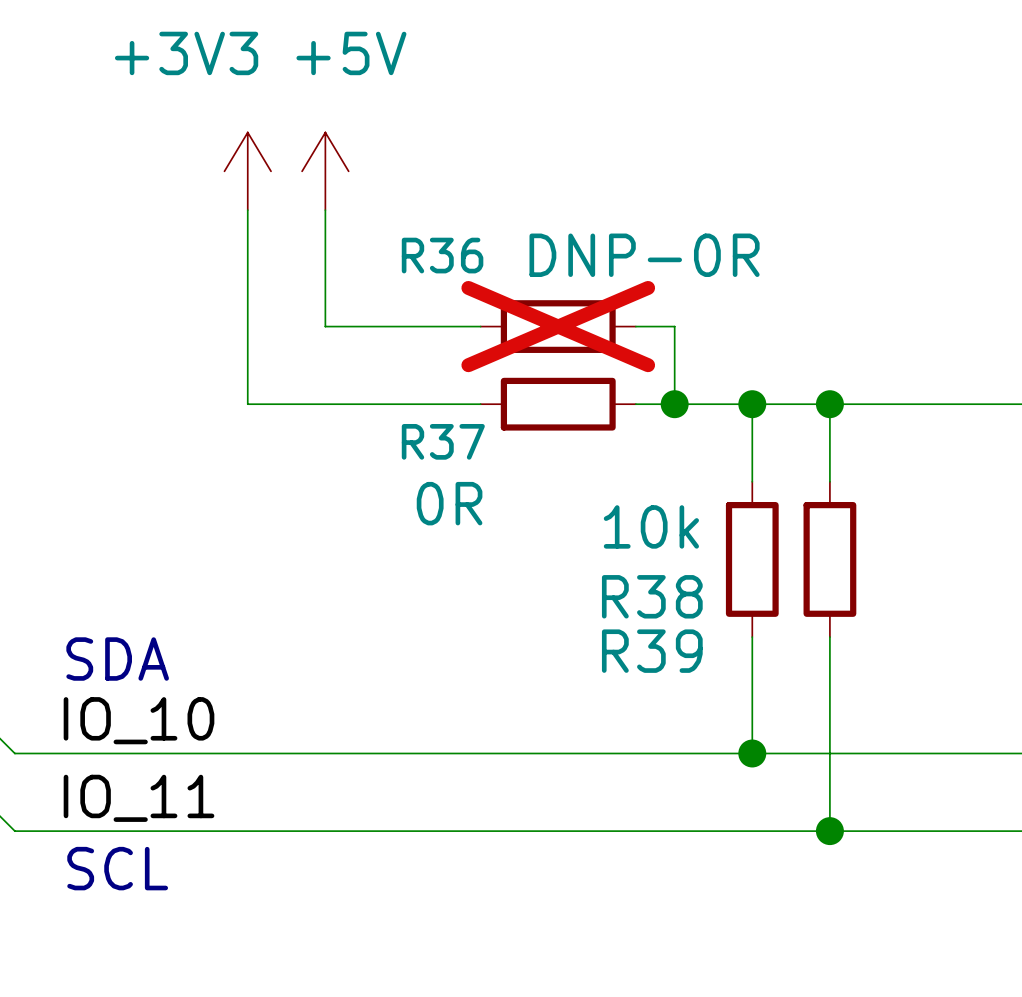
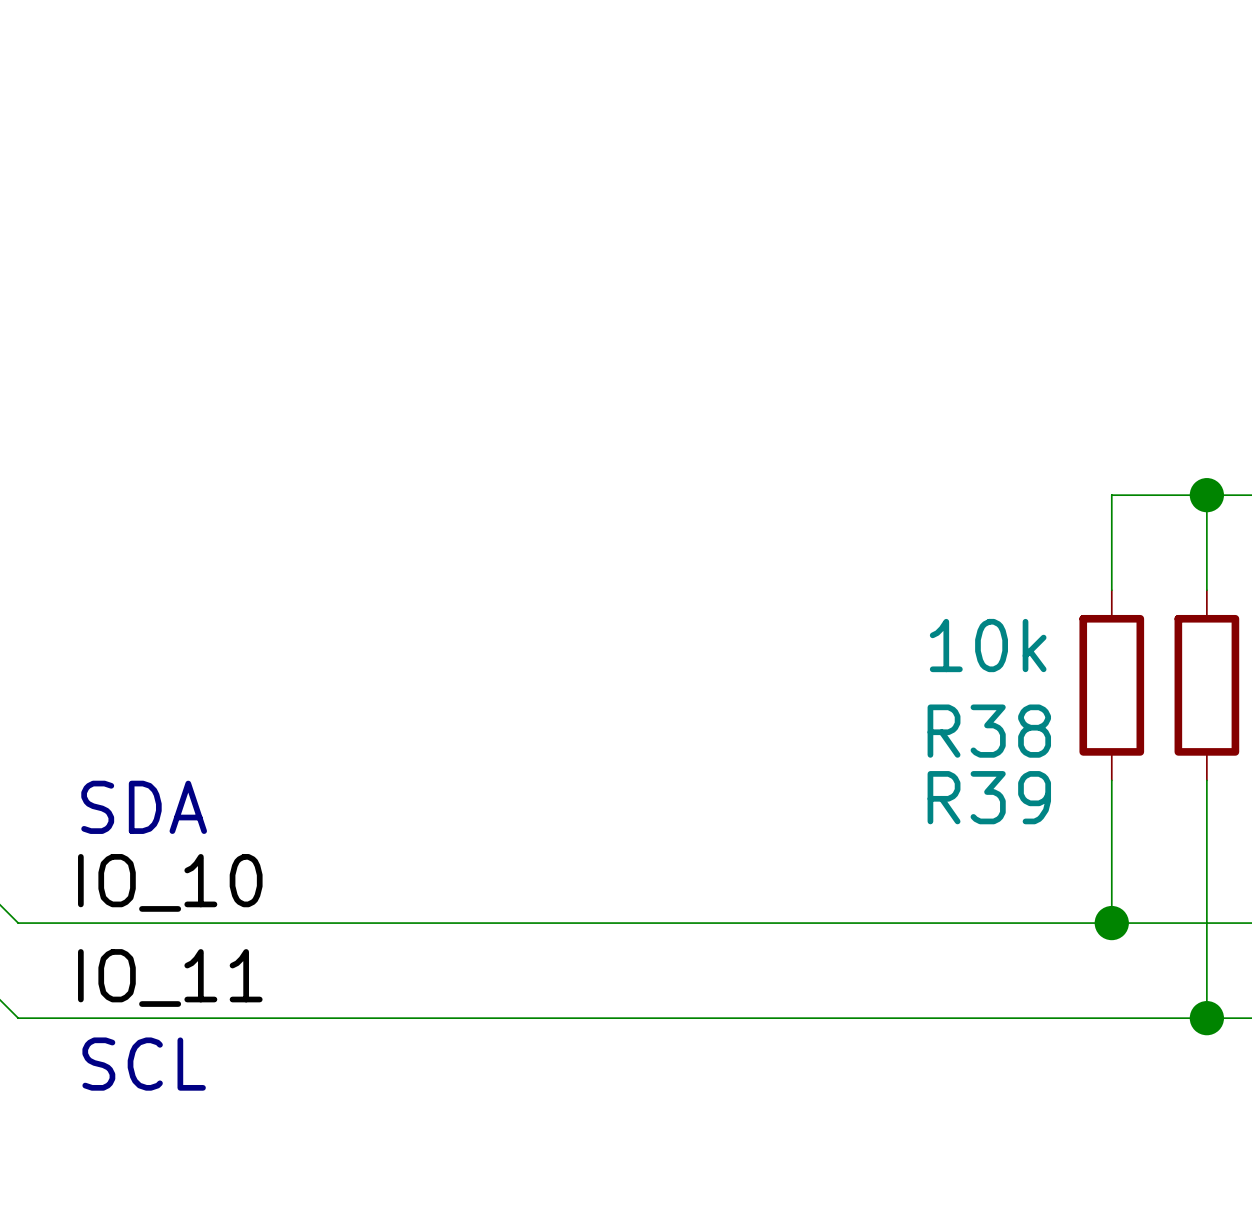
power symbol: +3V3 (247, 171) -> none
power symbol: +5V (325, 171) -> none
wire: (247, 210) (247, 404) (480, 404) -> none
wire: (325, 210) (325, 326) (480, 326) -> none
R36: DNP-0R (558, 326) -> none
wire: (635, 326) (674, 326) (674, 404) -> none
R37: 0R (558, 404) -> none
wire: (635, 404) (907, 404) -> (1111, 590) (1111, 495)
junction: (674, 404) -> none
wire: (752, 404) (752, 481) -> none
junction: (752, 404) -> none
wire: (829, 404) (829, 481) -> (1206, 495) (1206, 590)
junction: (829, 404) -> none
junction: none -> (1206, 495)
R38 position: (752, 559) -> (1111, 685)
R39 position: (829, 559) -> (1206, 685)
wire: (752, 637) (752, 753) -> (1111, 780) (1111, 923)
wire: (829, 637) (829, 831) -> (1206, 780) (1206, 1018)
junction: (752, 753) -> none
junction: none -> (1111, 923)
junction: (829, 831) -> none
junction: none -> (1206, 1018)

